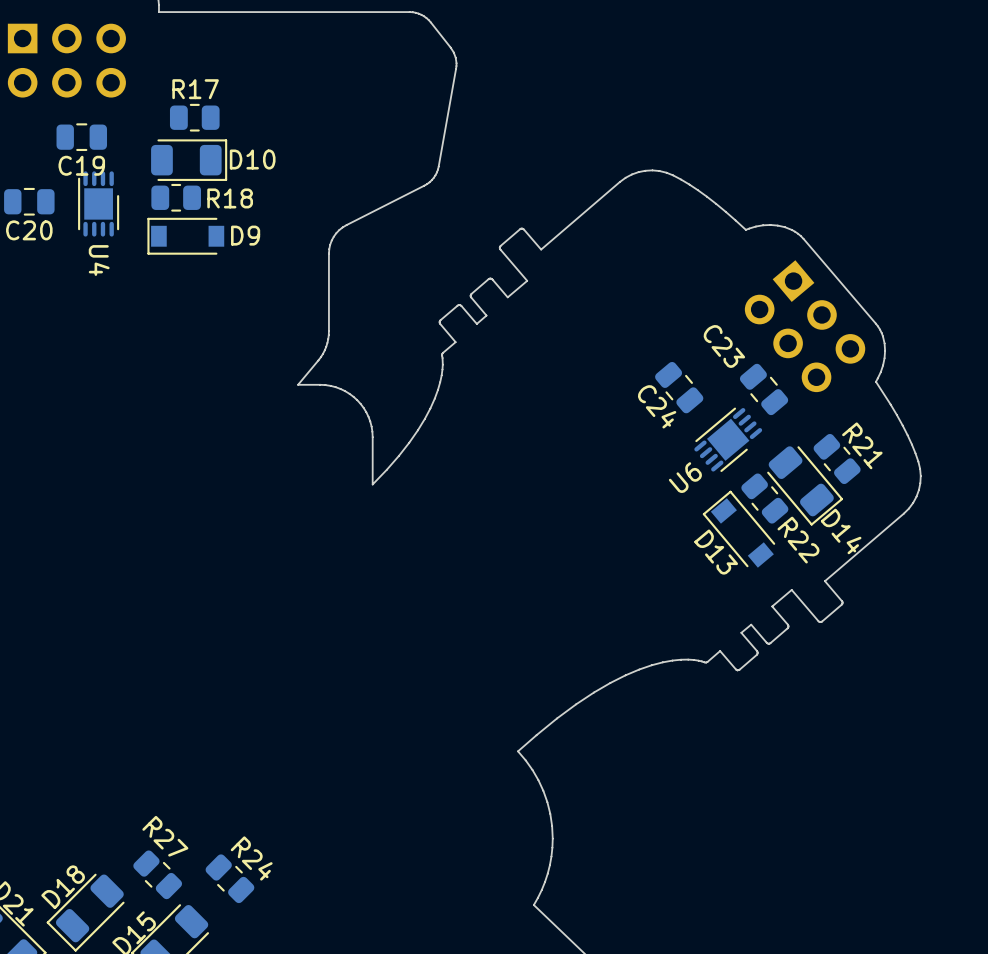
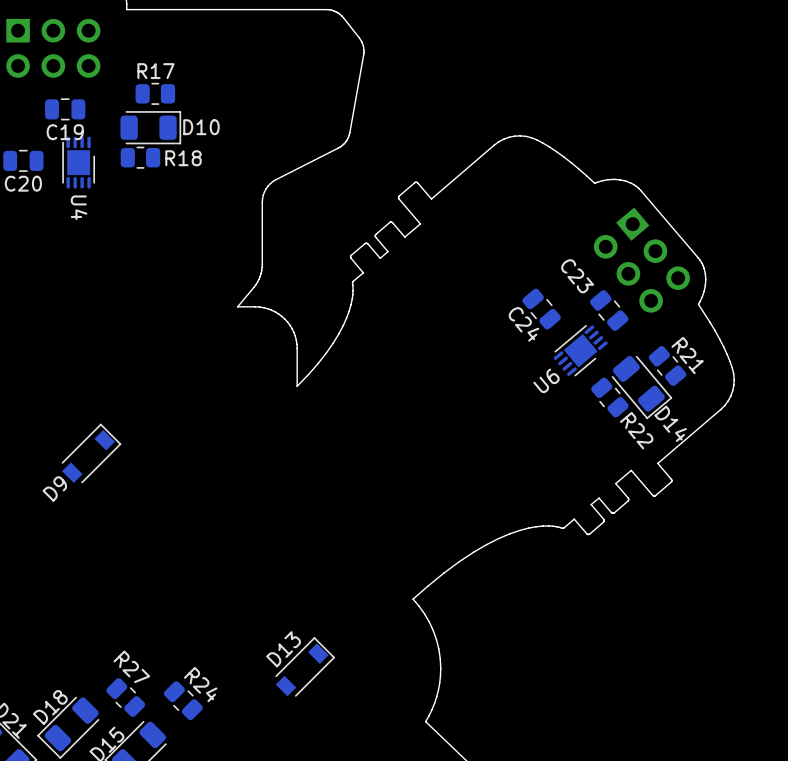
D9 rotation: 0° (185, 236) -> 135° clockwise (91, 453)
D9 position: (185, 236) -> (91, 453)
D13 rotation: 0° (739, 529) -> 85° clockwise (305, 666)
D13 position: (739, 529) -> (305, 666)

